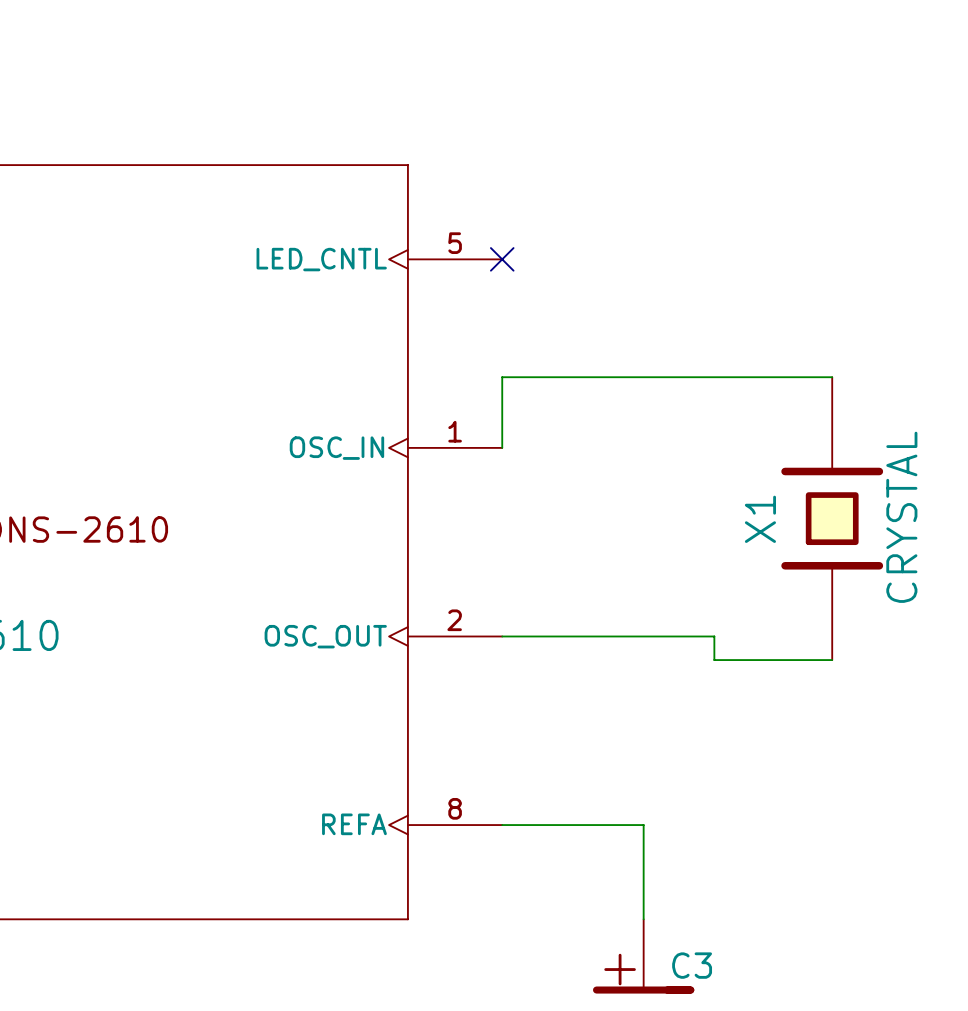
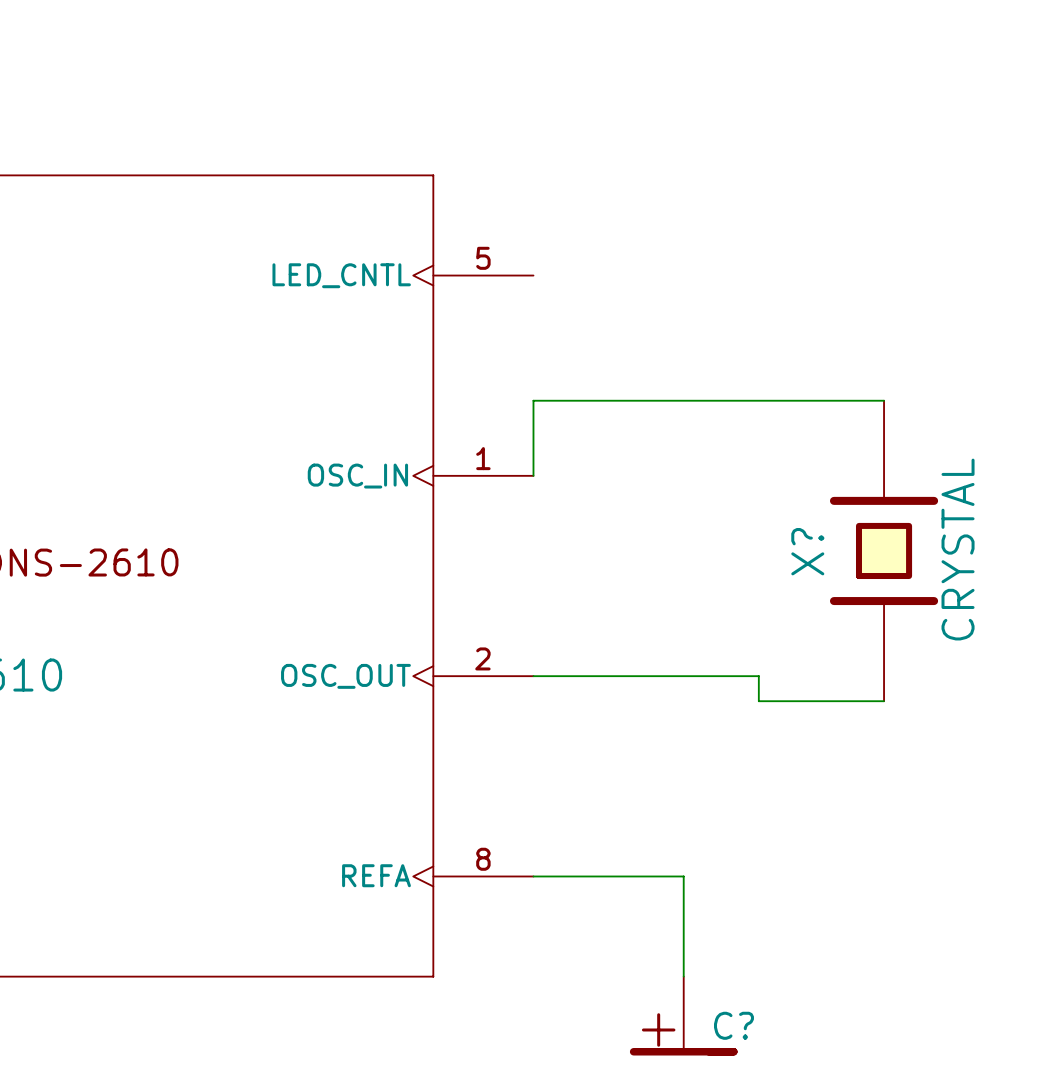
no-connect mark: (502, 259) -> none
X1 name: X1 (760, 519) -> X? (807, 551)
C3 name: C3 (692, 965) -> C? (733, 1025)

